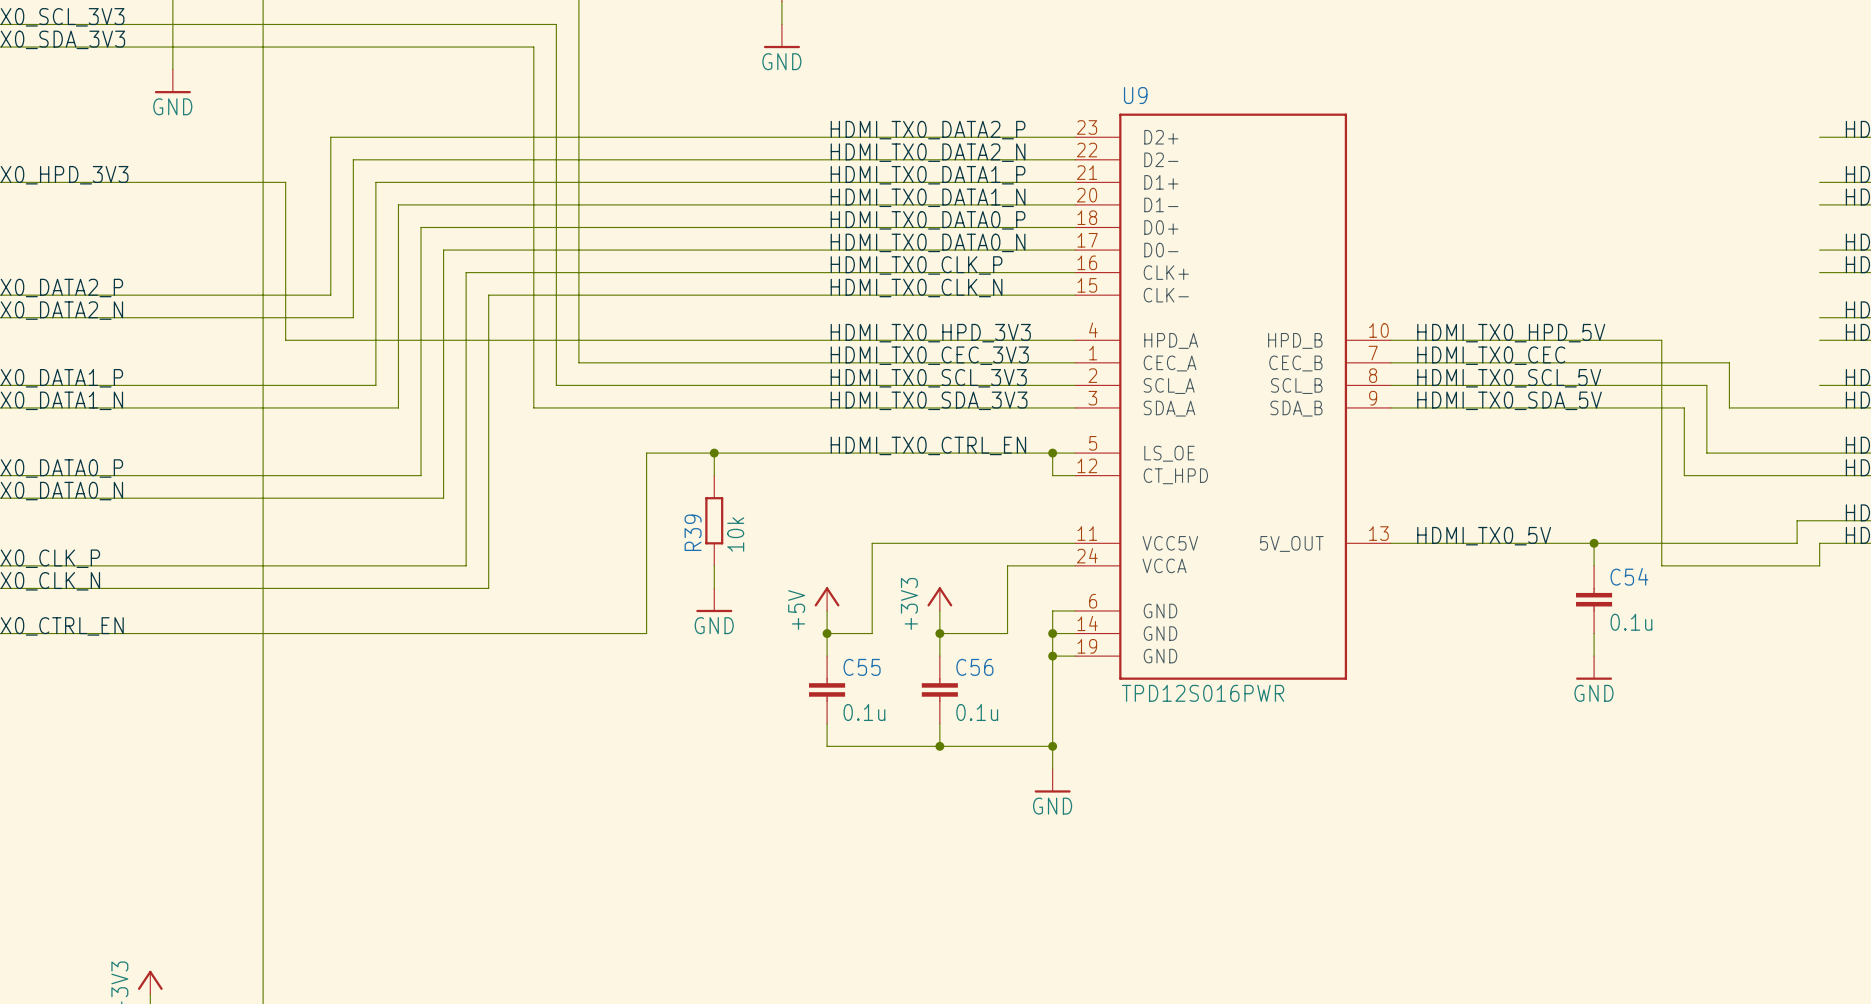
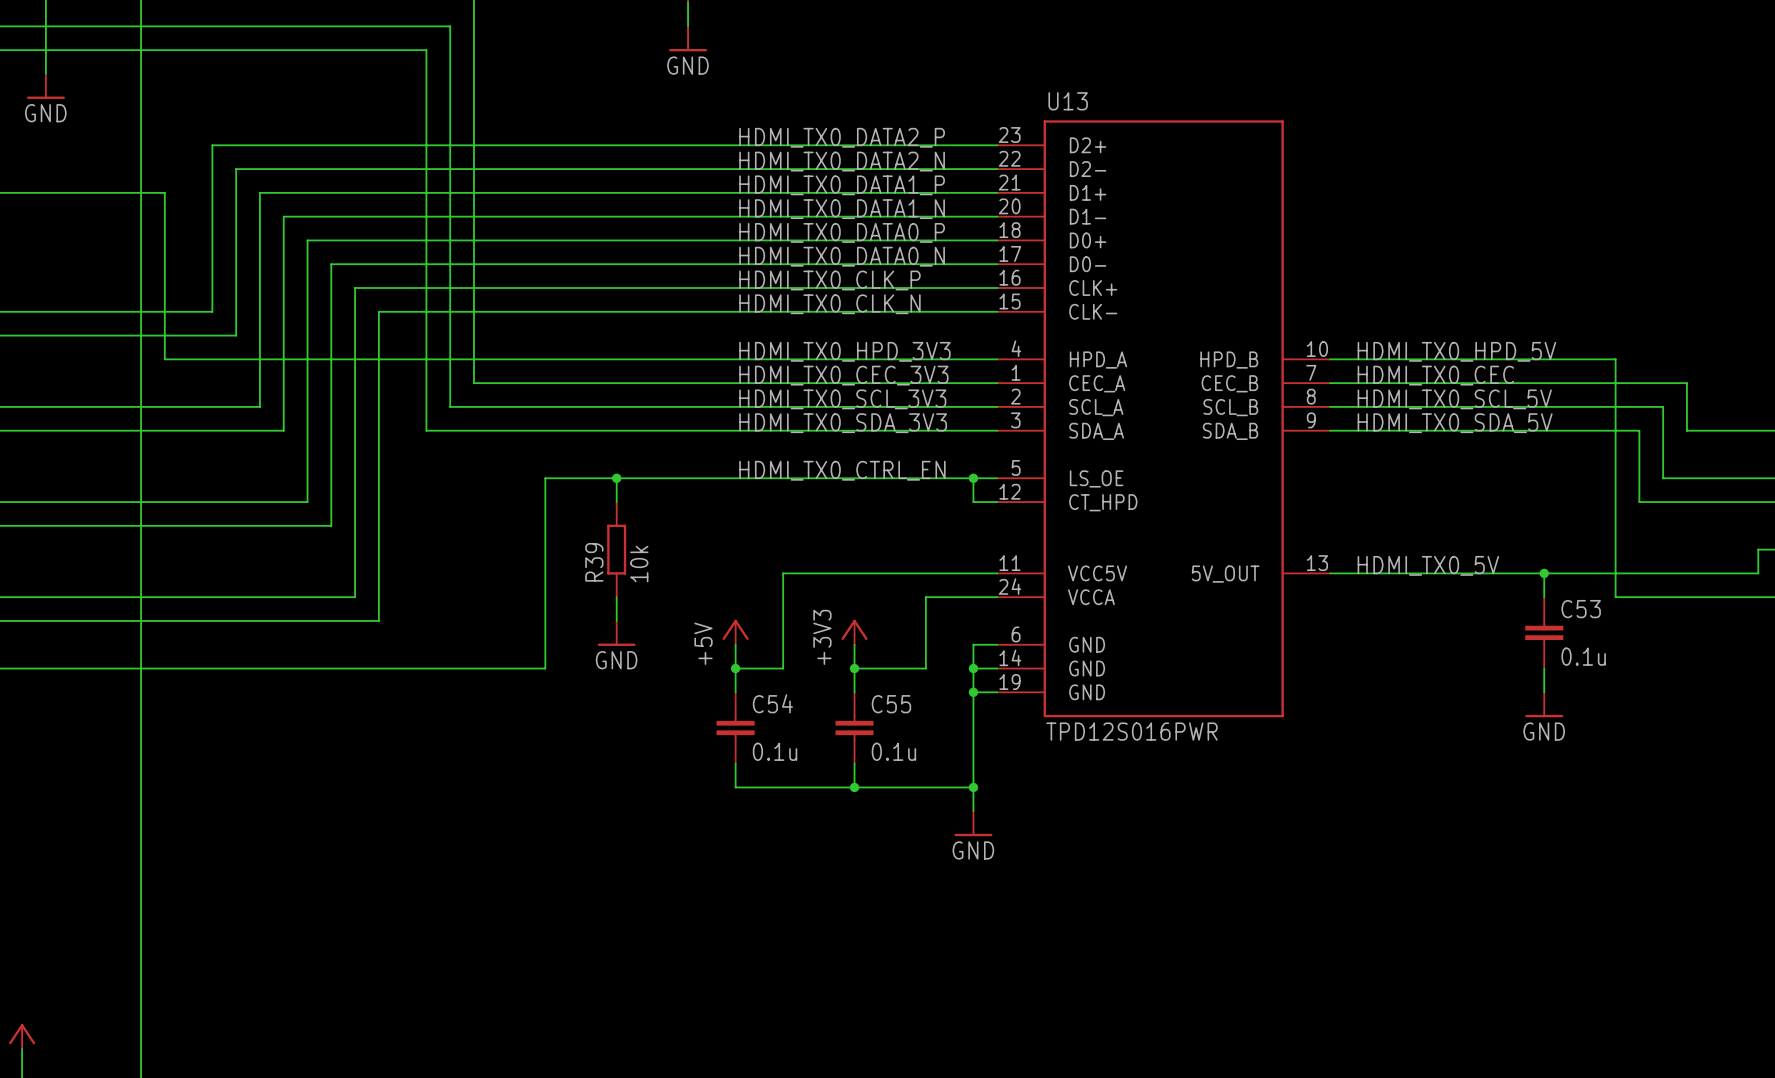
U9 name: U9 (1135, 95) -> U13 (1068, 101)
C54 name: C54 (1629, 576) -> C53 (1581, 609)
C55 name: C55 (862, 667) -> C54 (772, 703)
C56 name: C56 (974, 667) -> C55 (891, 704)

